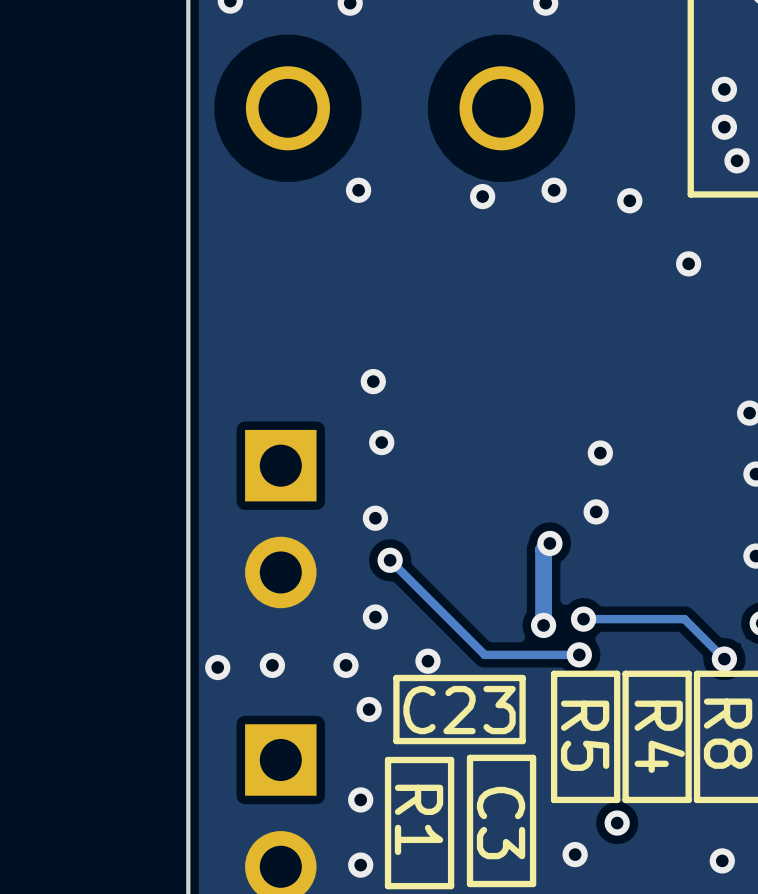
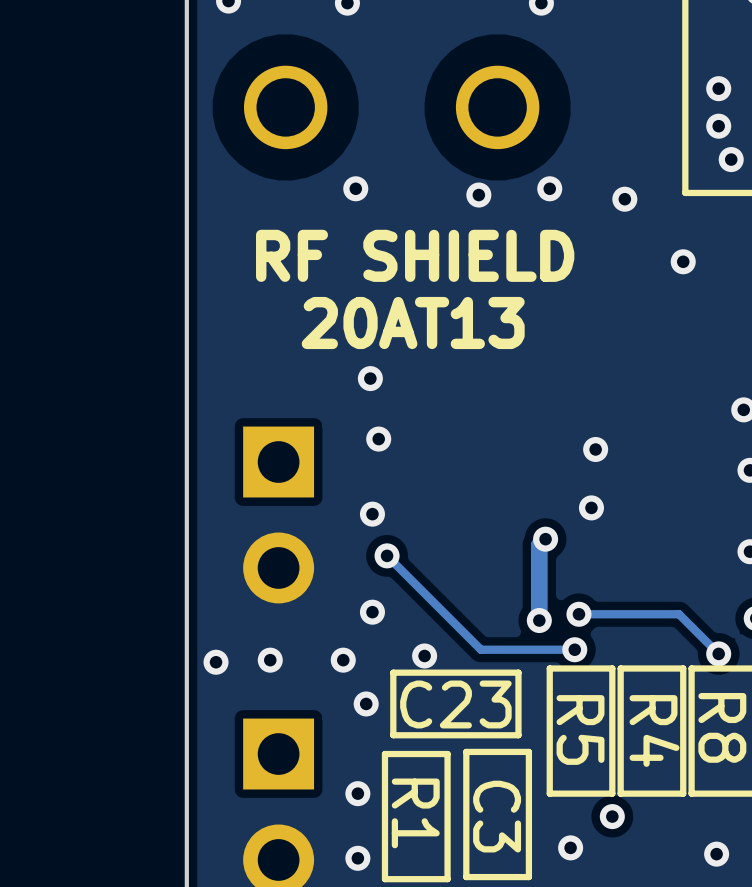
text: none -> RF SHIELD (415, 255)
text: none -> 20AT13 (413, 323)

